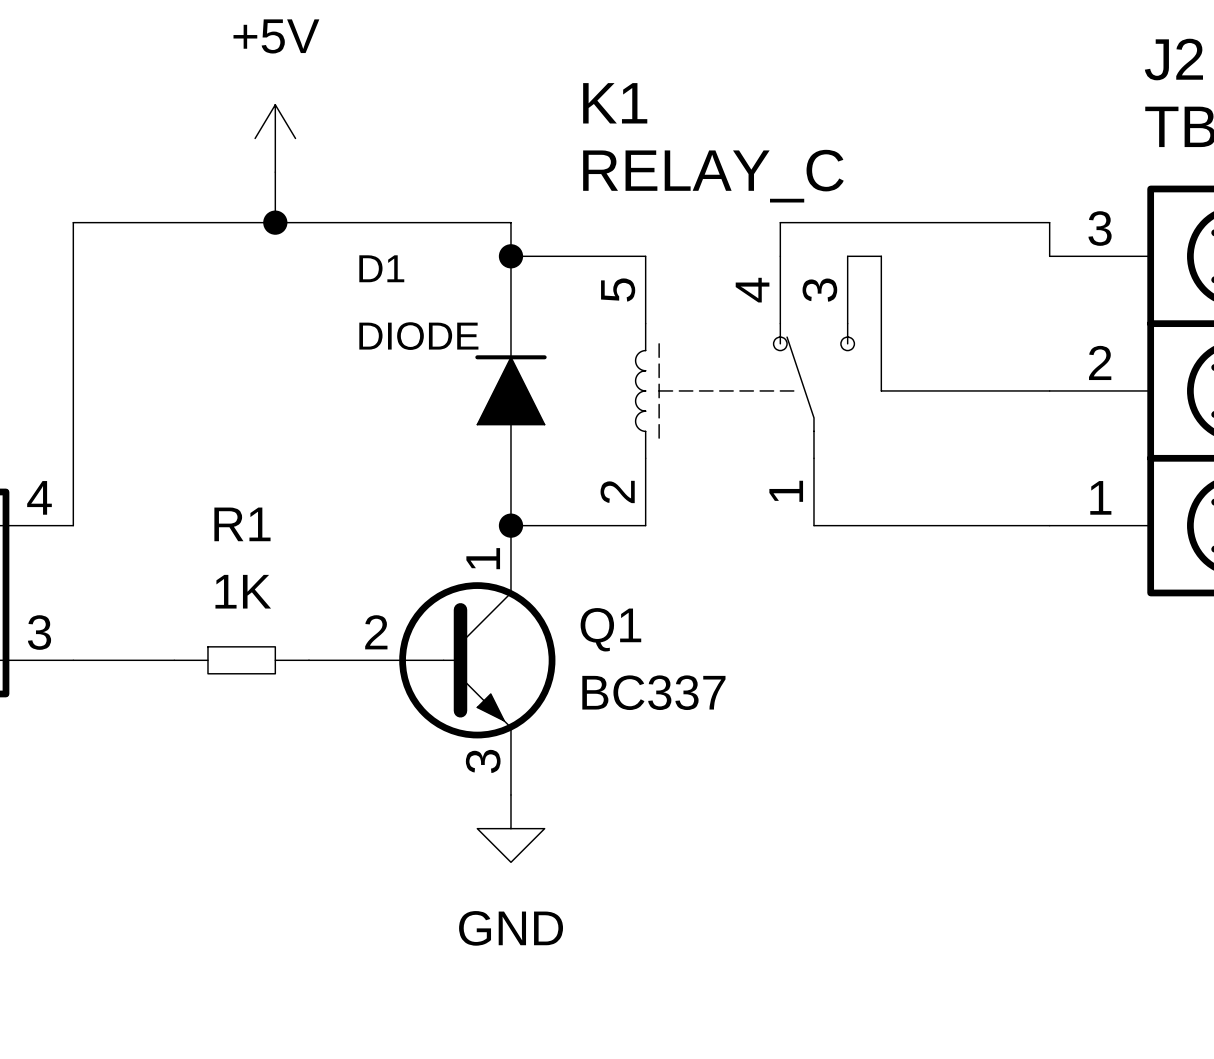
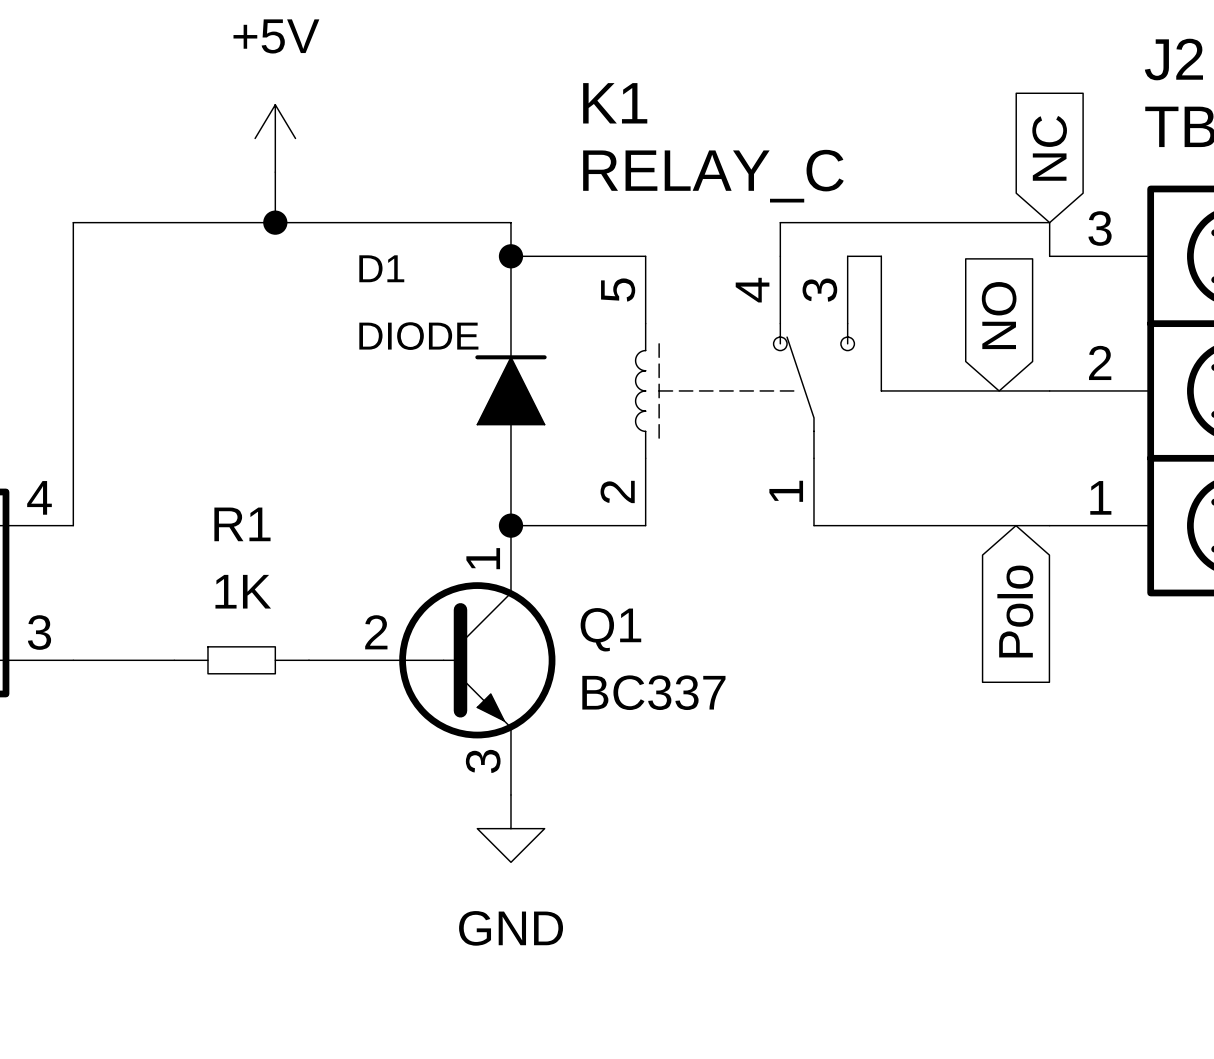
global label: none -> NC (1049, 148)
global label: none -> NO (999, 315)
global label: none -> Polo (1015, 611)

